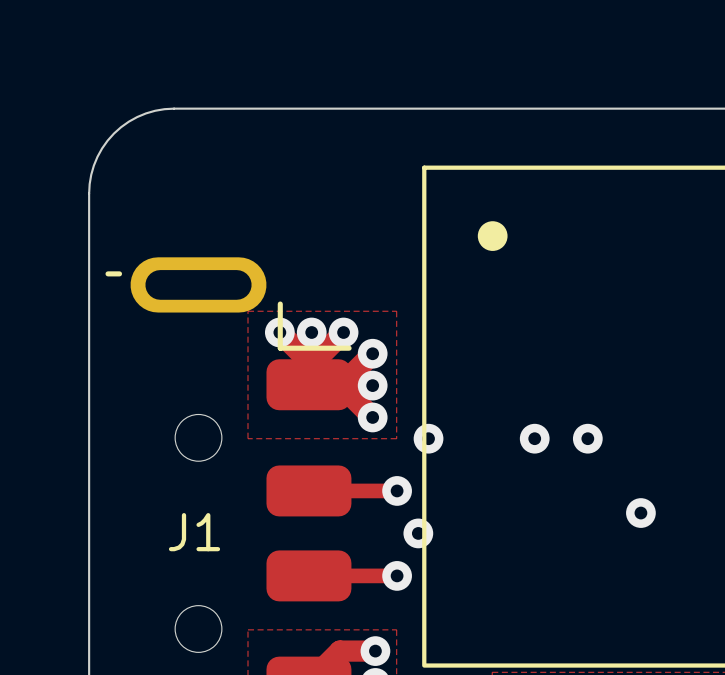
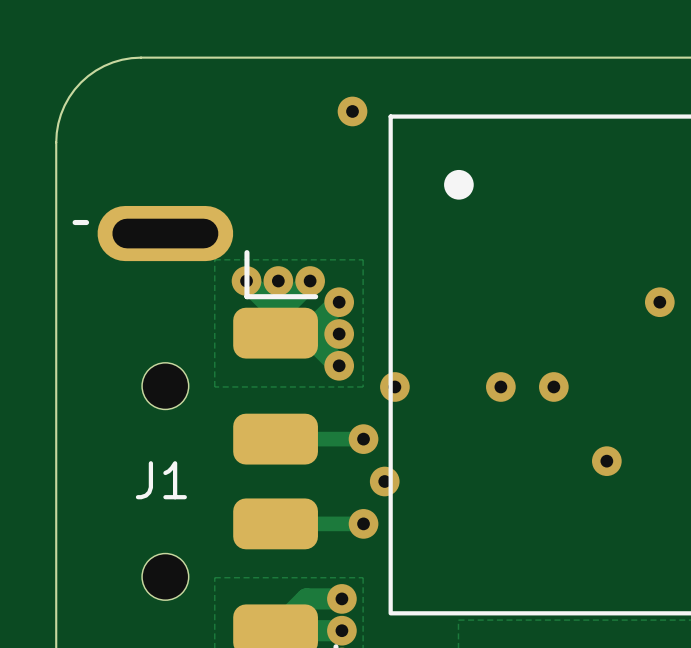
via: none -> (352, 111)
via: none -> (659, 302)

